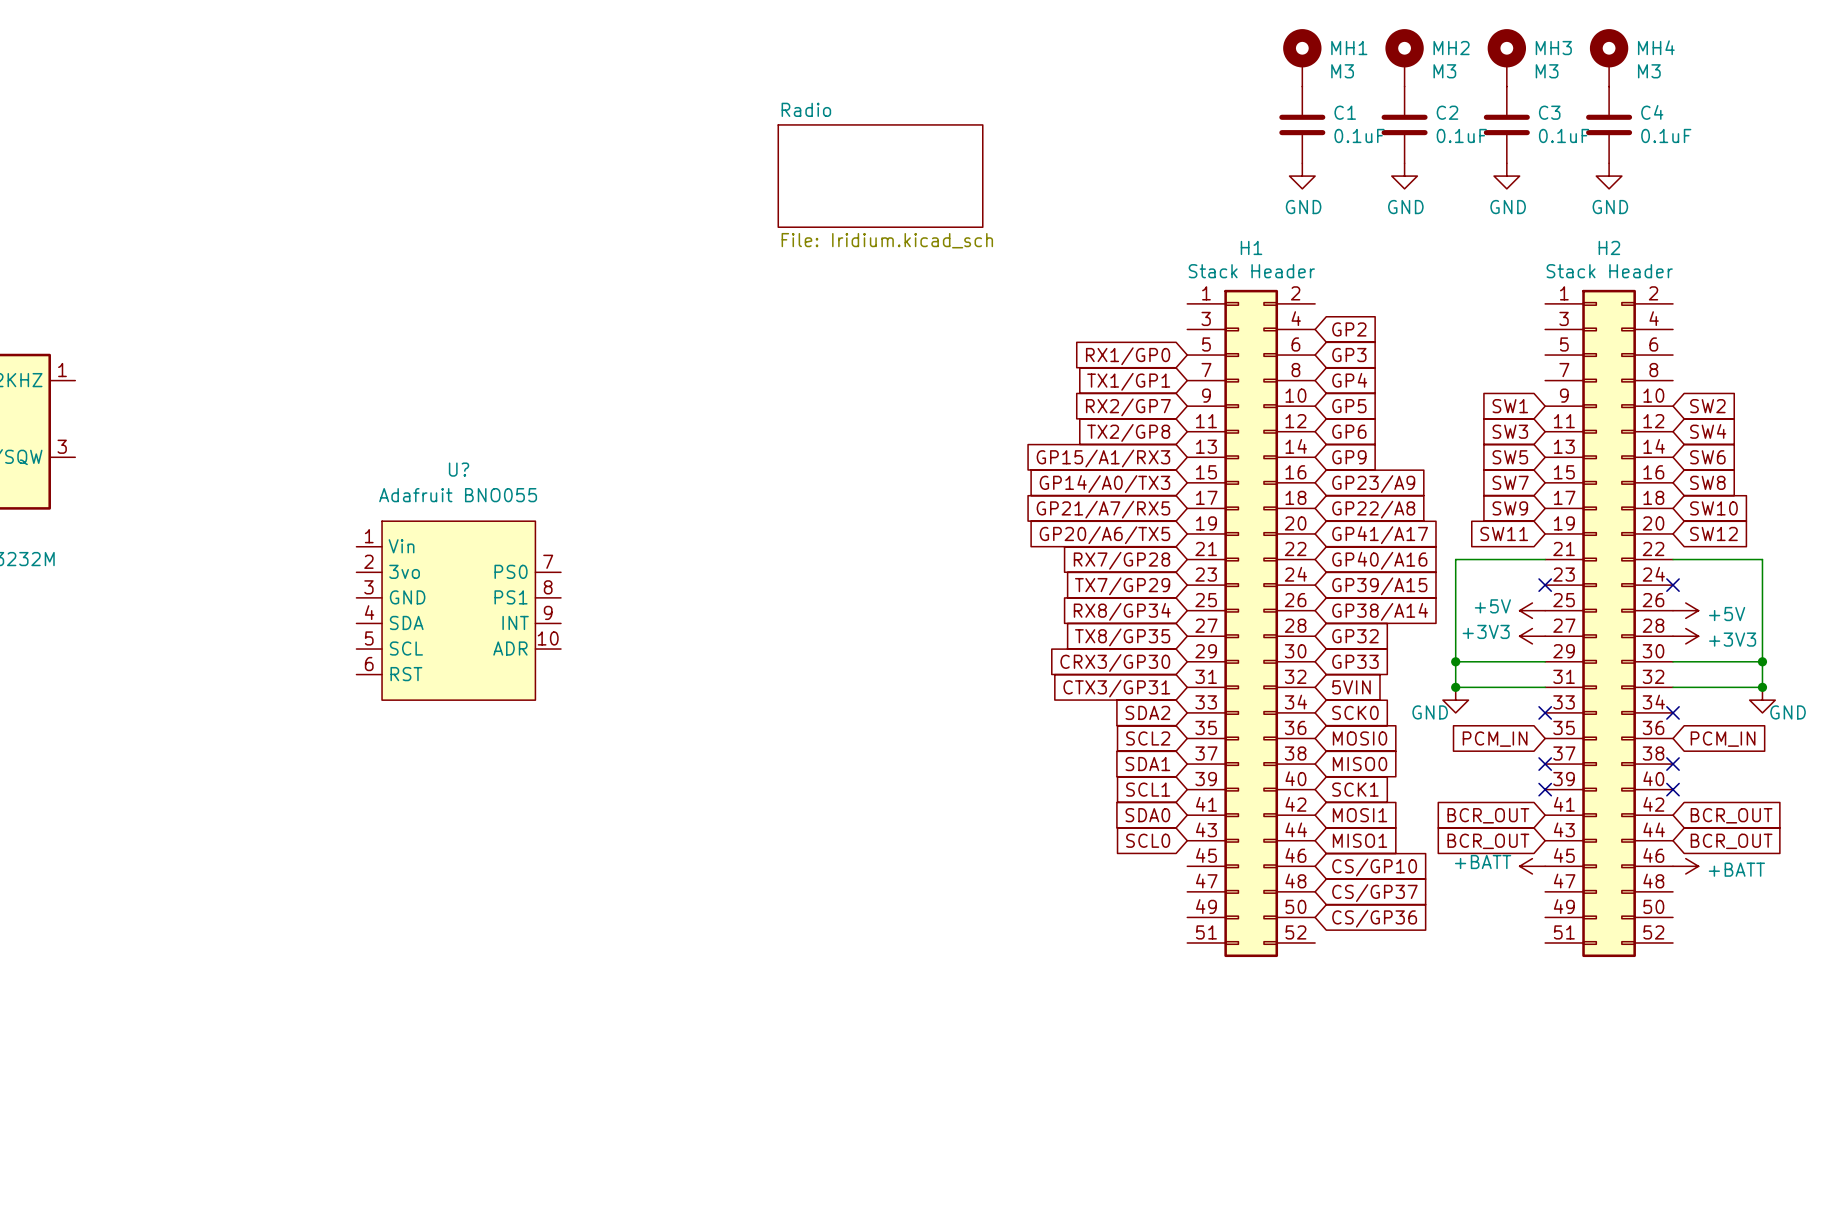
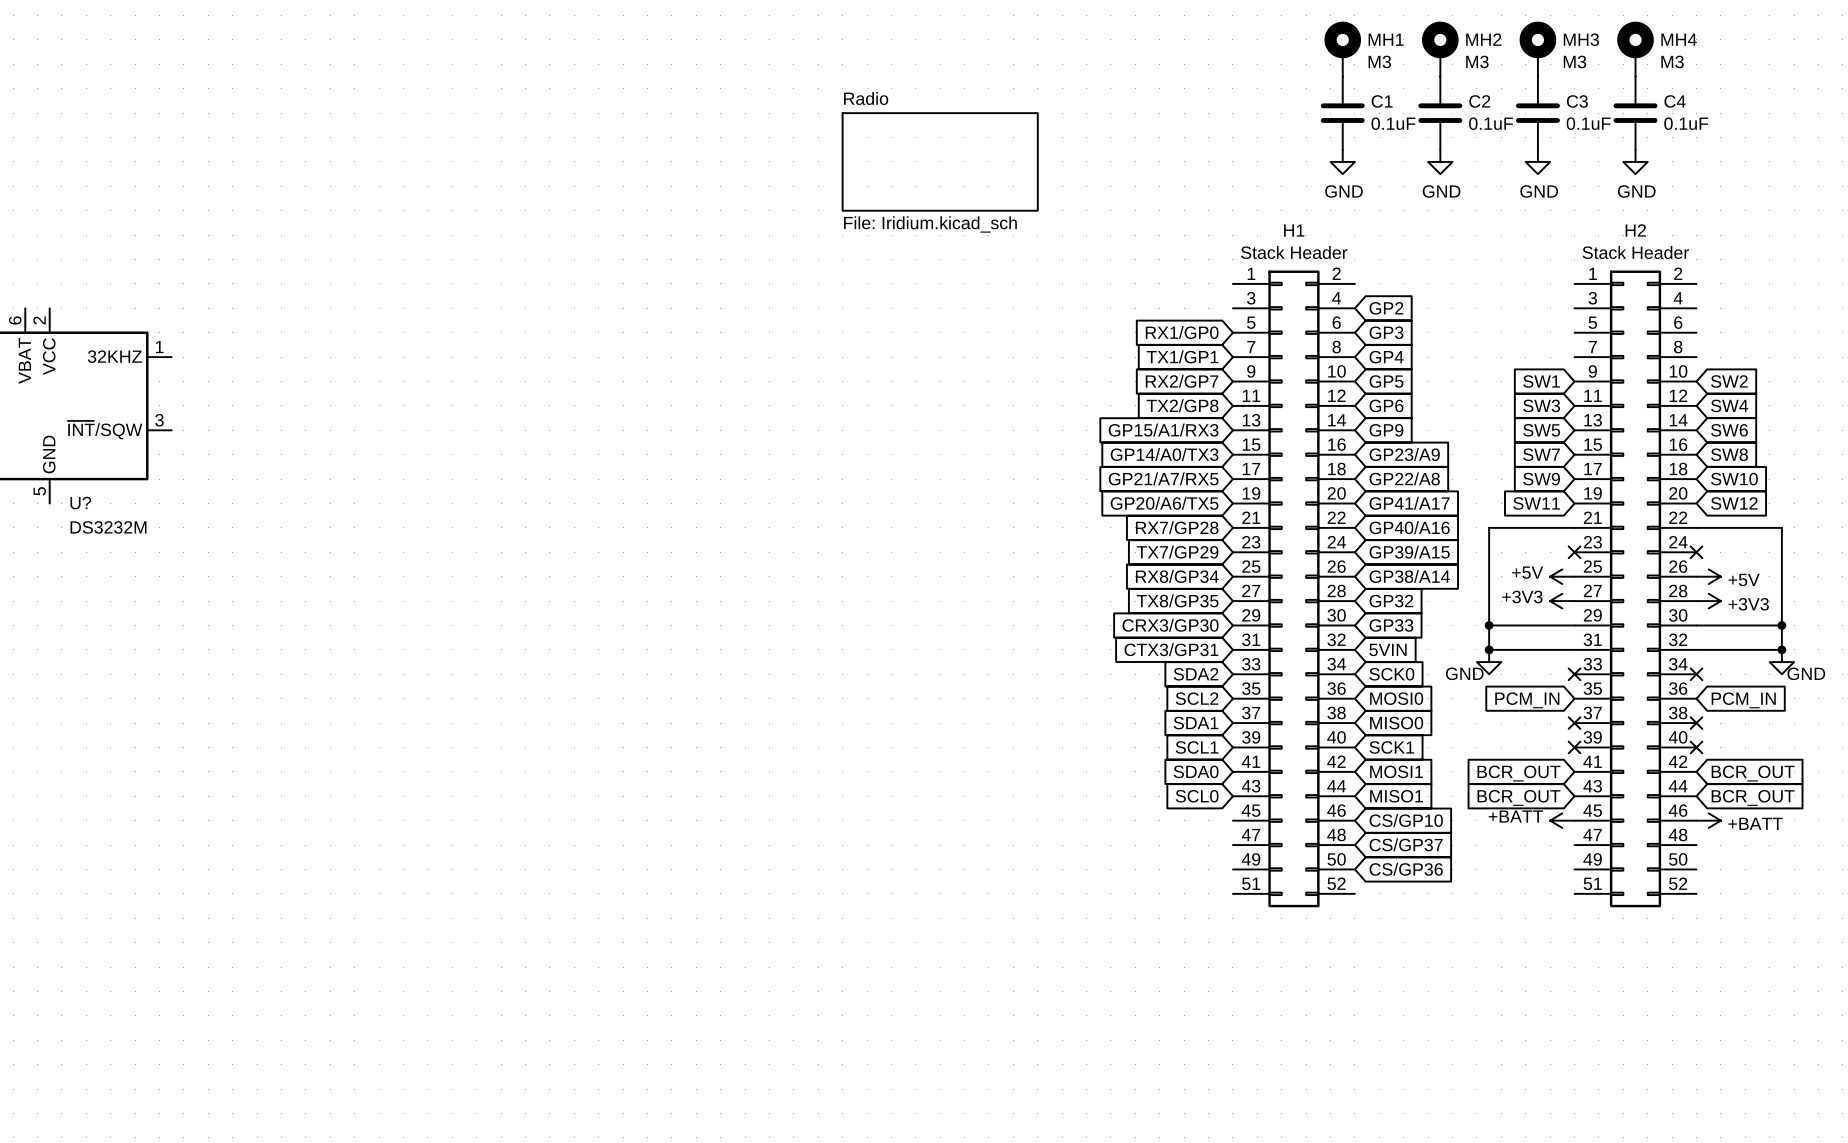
U?: Adafruit BNO055 (458, 610) -> none

